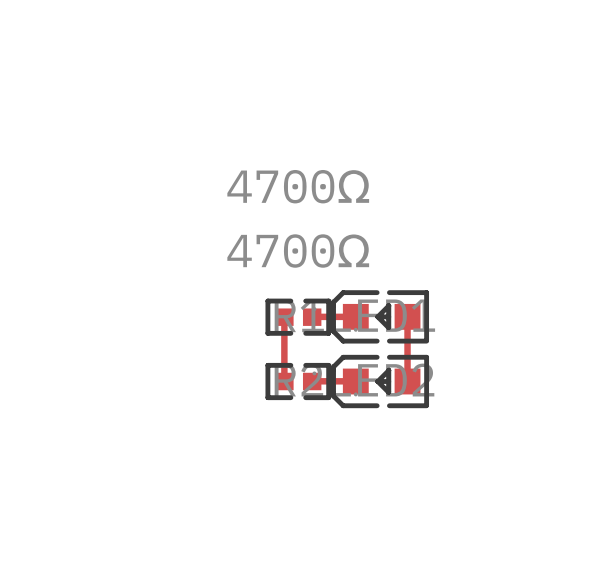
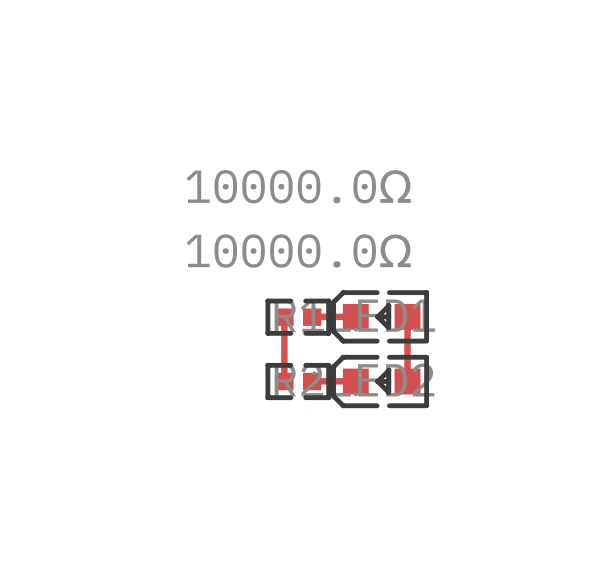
part value: 4700Ω (298, 186) -> 10000.0Ω (298, 186)
part value: 4700Ω (298, 251) -> 10000.0Ω (298, 251)

